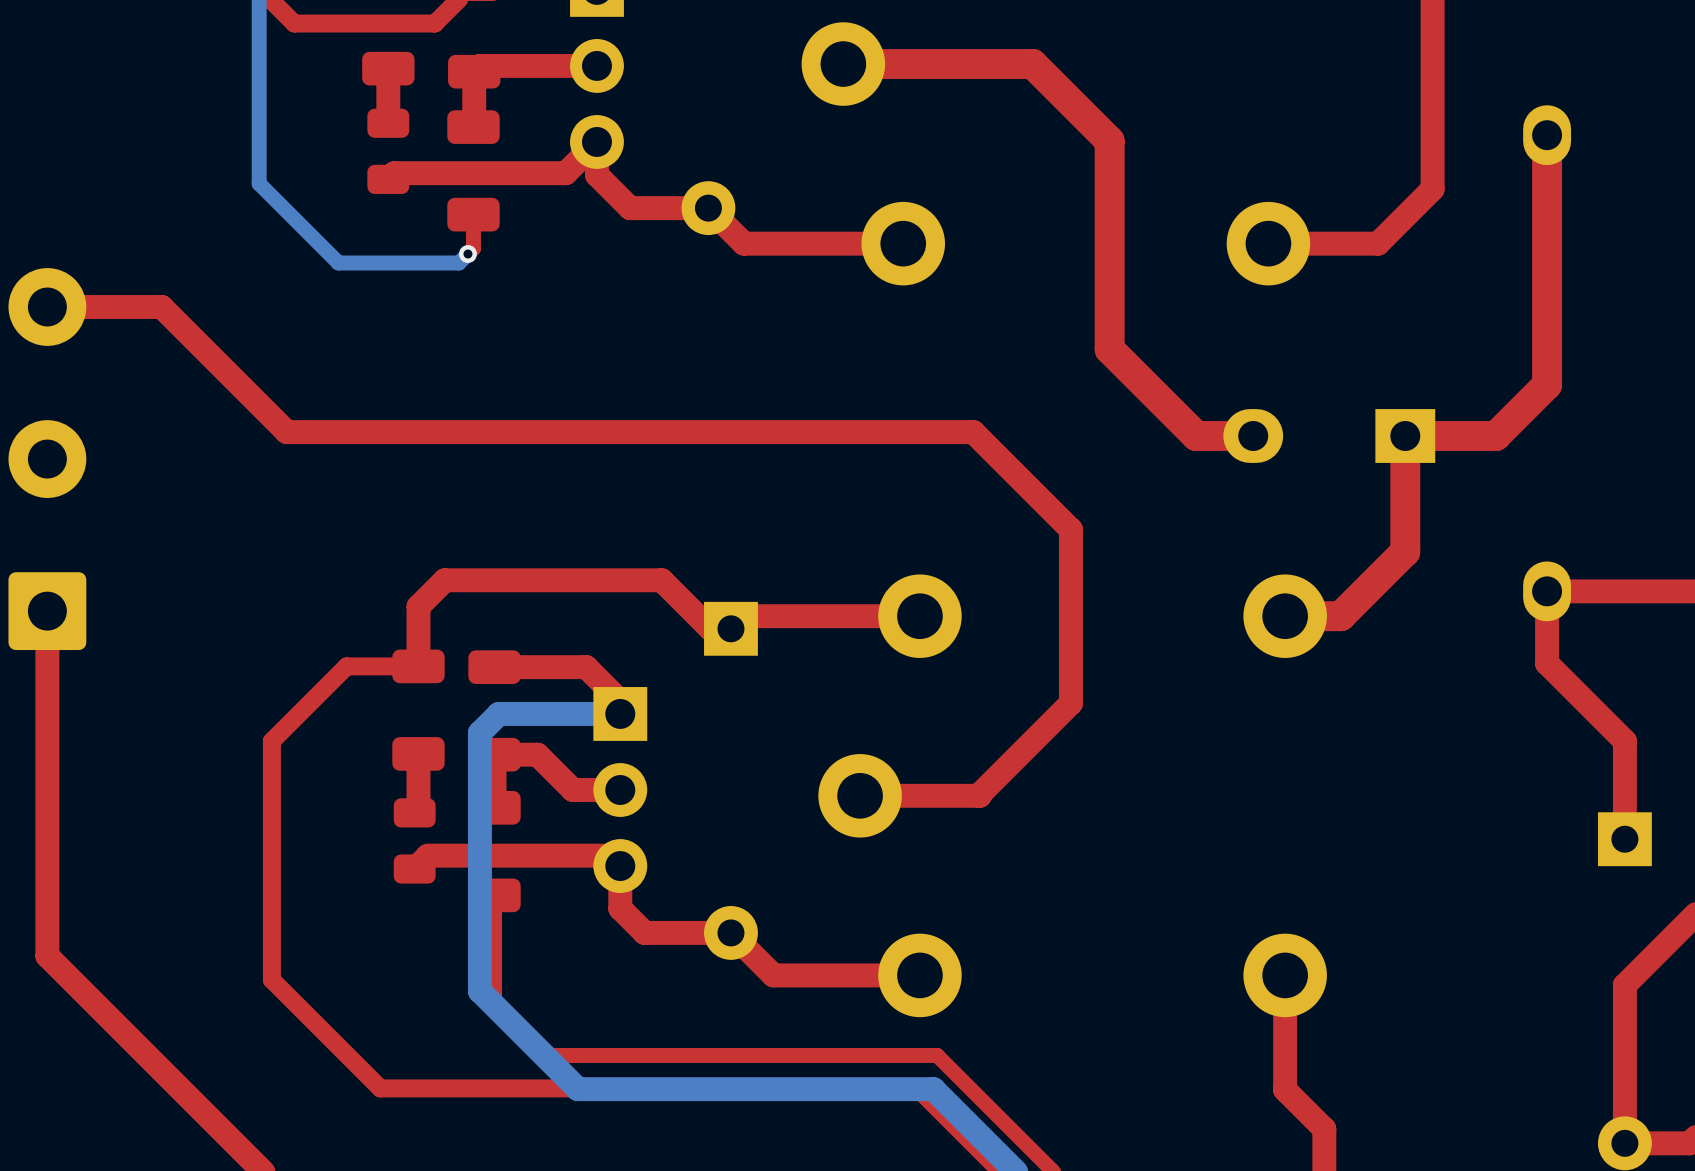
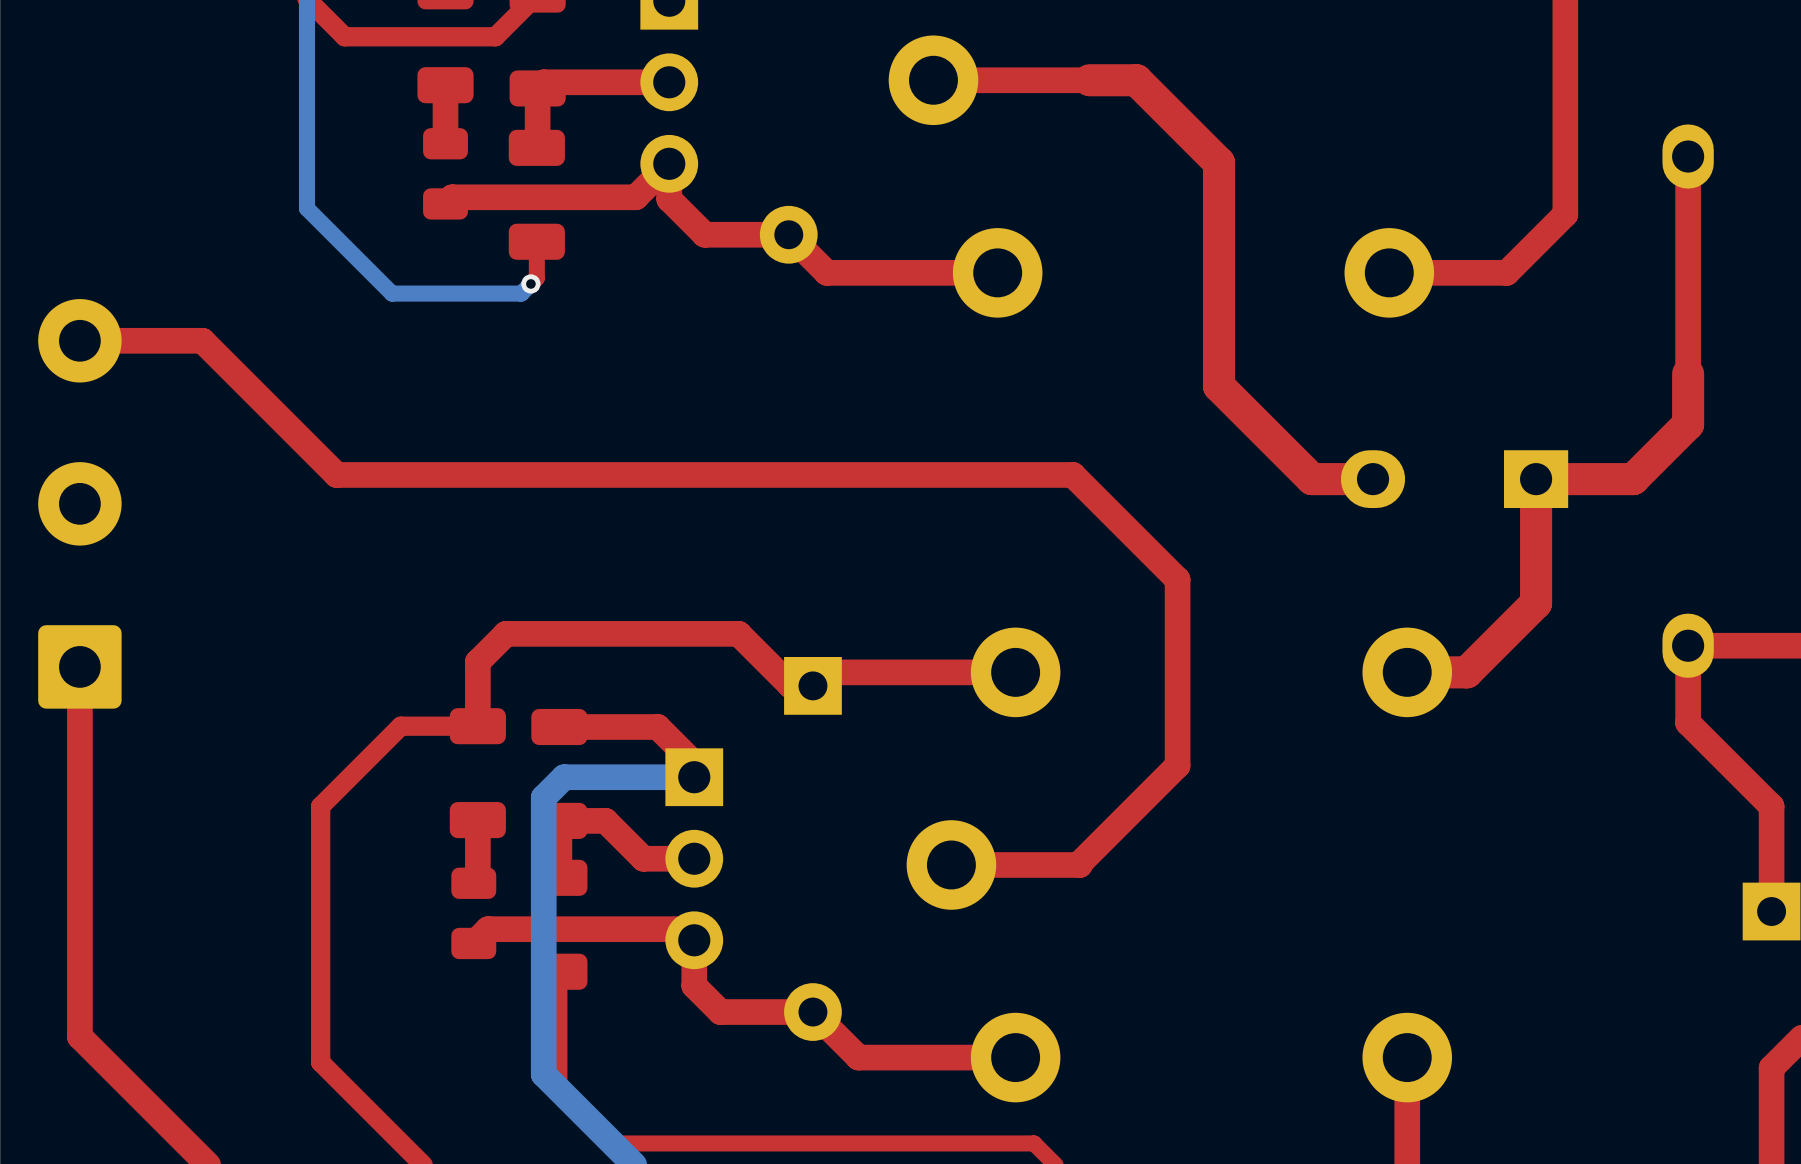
top track width: thick (988, 64) (843, 64) -> thin (1089, 80) (933, 80)
top track width: thick (1547, 135) (1547, 337) -> thin (1688, 156) (1688, 373)

